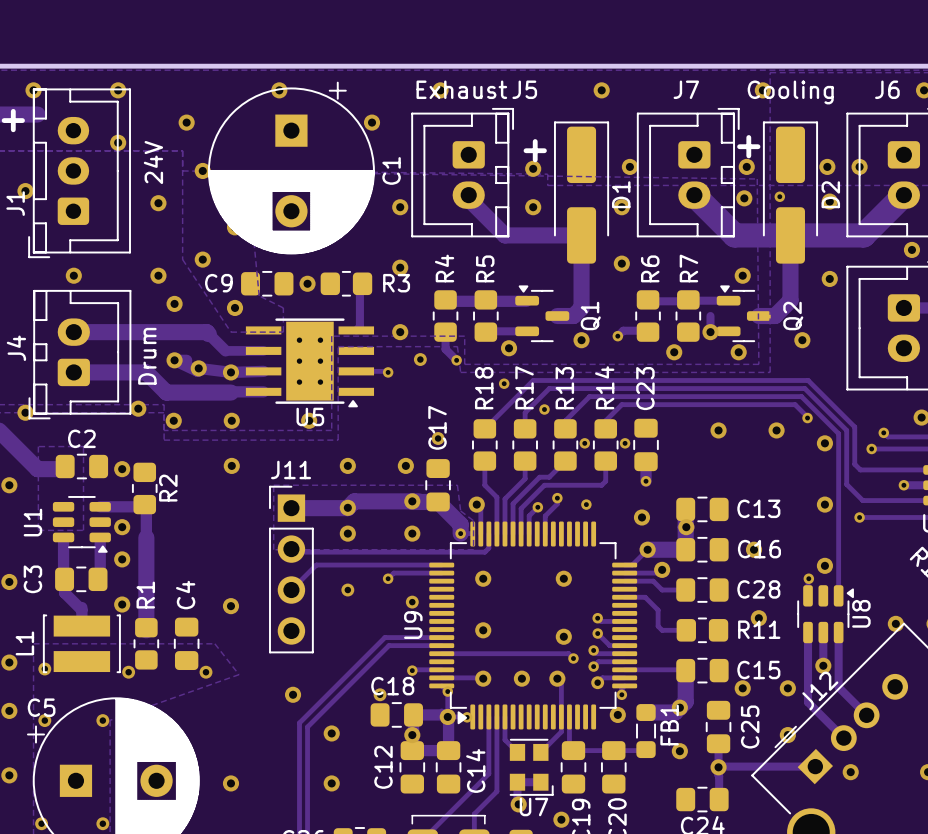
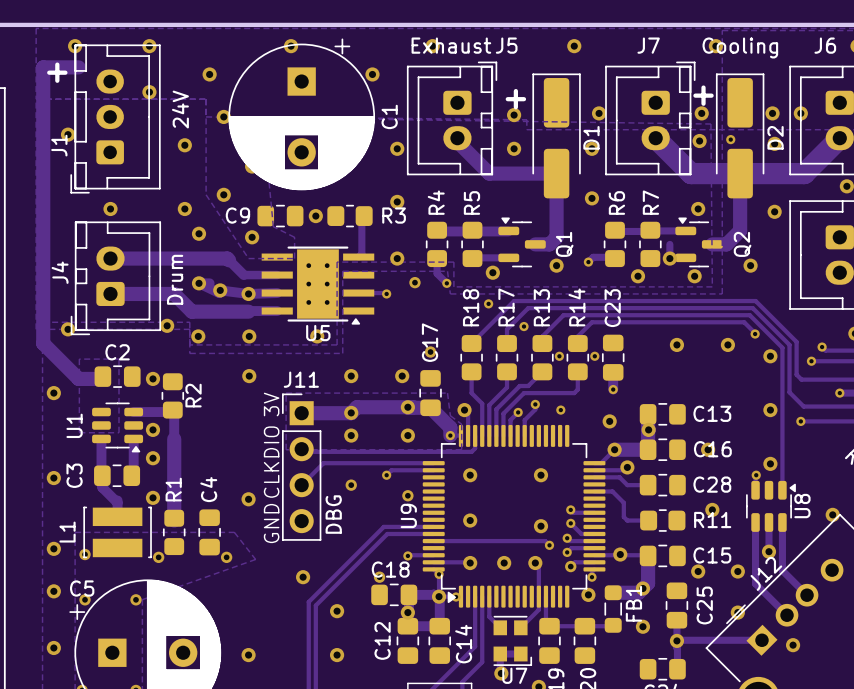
text: none -> 3V (271, 404)
text: none -> DIO (271, 441)
text: none -> CLK (271, 479)
J11 value: none -> DBG (333, 514)
text: none -> GND (271, 523)
via: none -> (620, 554)

